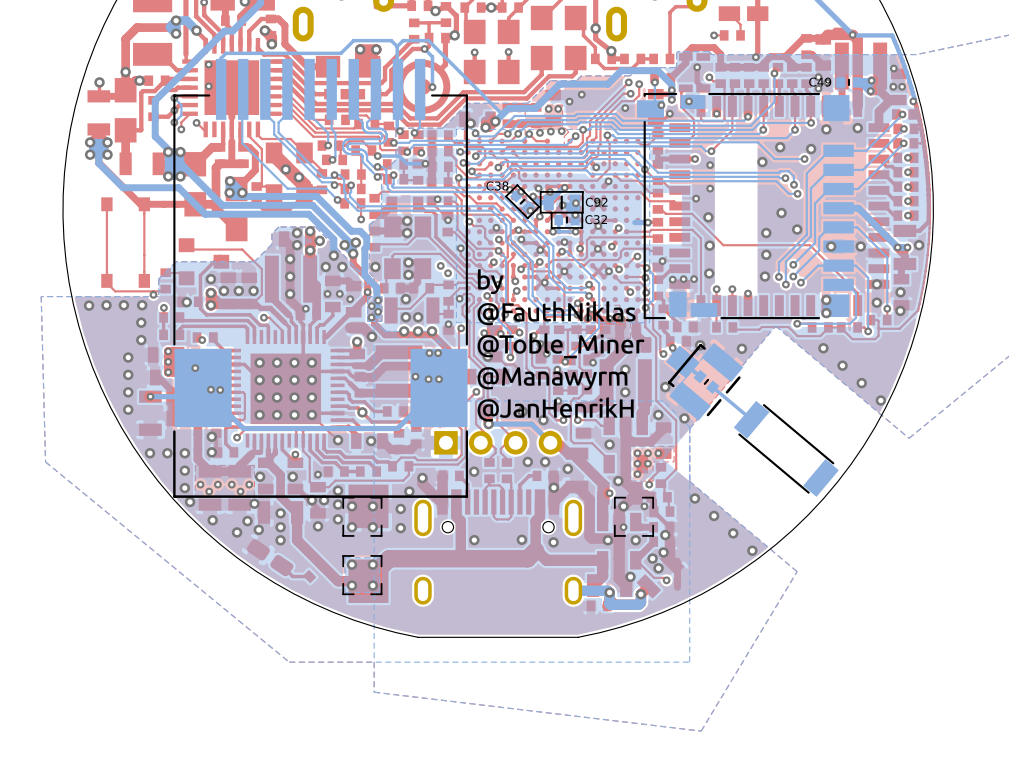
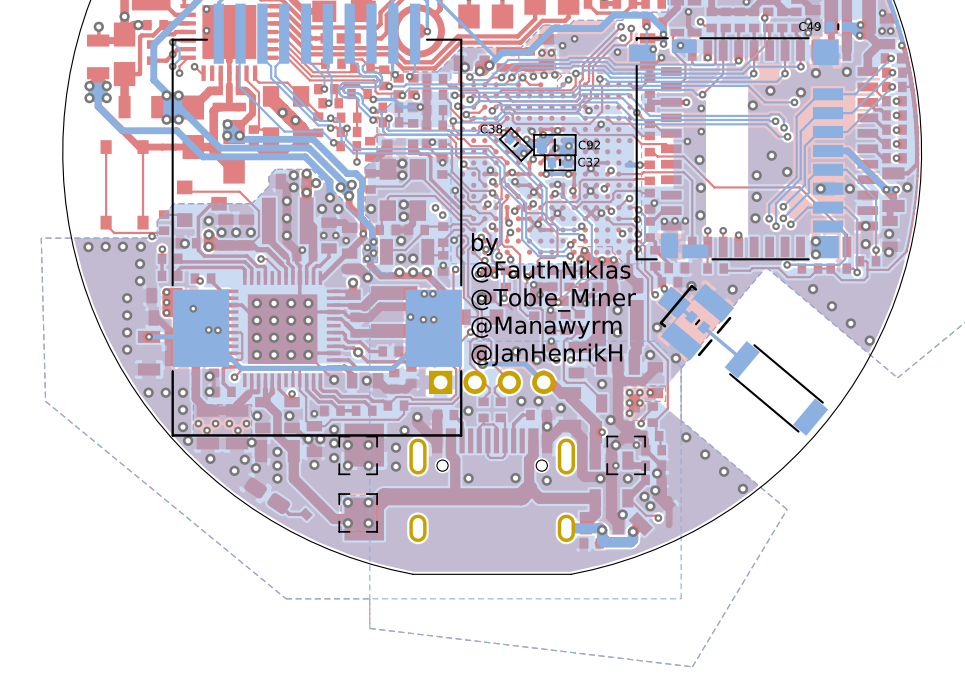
drawing: [477, 269, 645, 422] -> none
text: none -> by (485, 244)
text: none -> @FauthNiklas (550, 271)
text: none -> @Toble_Miner (553, 299)
text: none -> @Manawyrm (546, 327)
text: none -> @JanHenrikH (546, 354)

